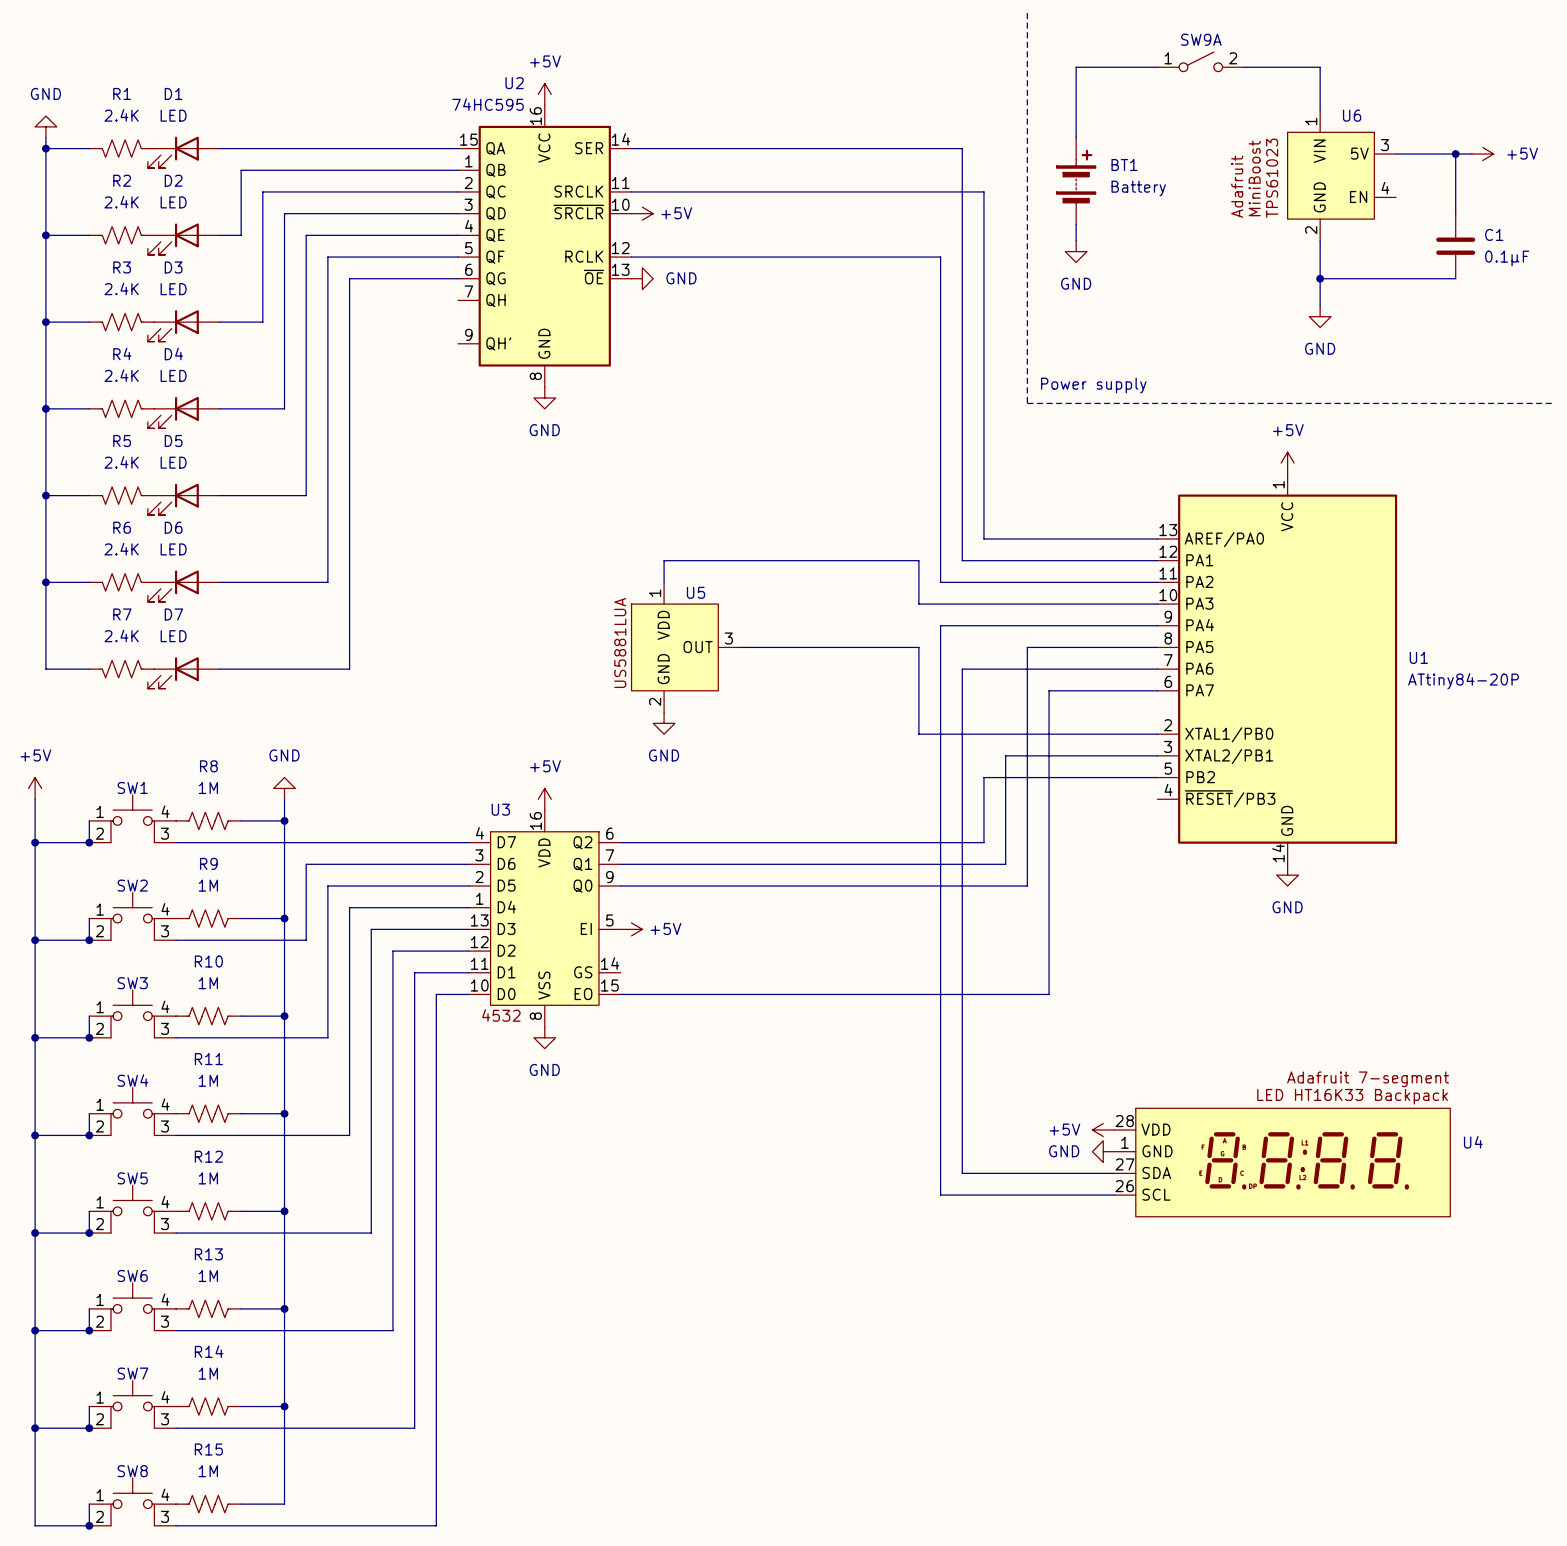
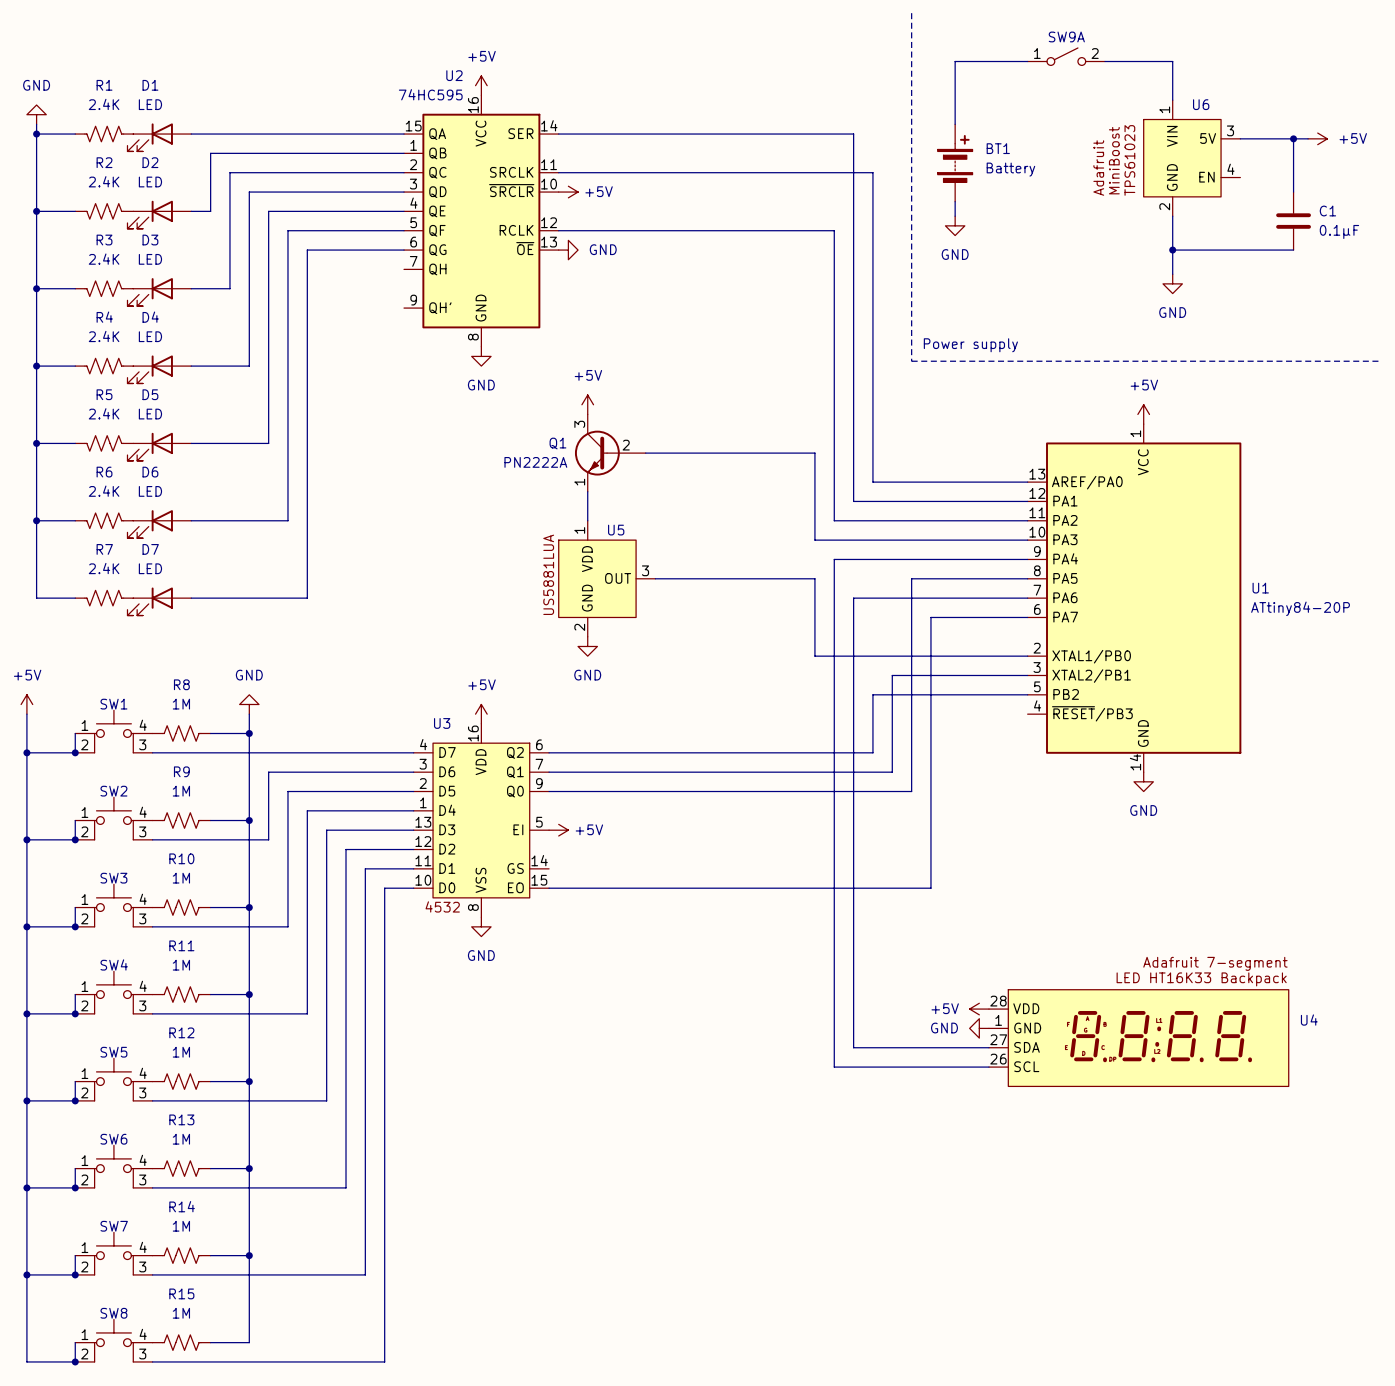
power symbol: none -> +5V (587, 404)
Q1: none -> PN2222A (610, 453)
wire: none -> (587, 491) (587, 501)
wire: (664, 560) (918, 560) -> (645, 453) (814, 453) (814, 501)

